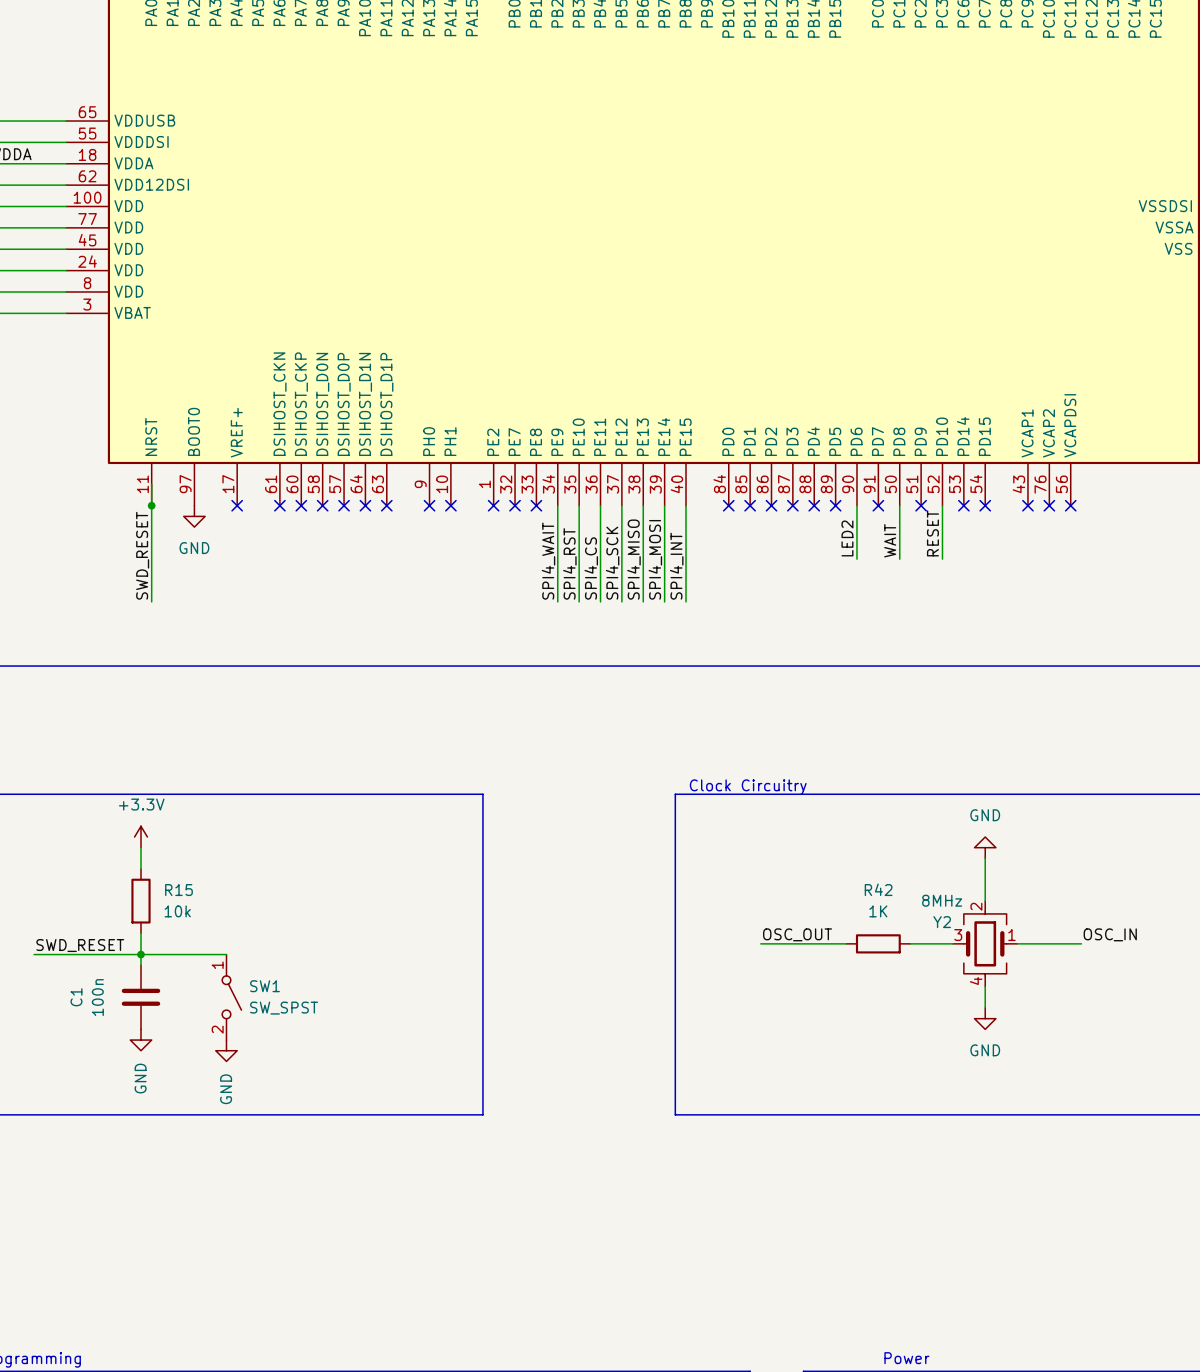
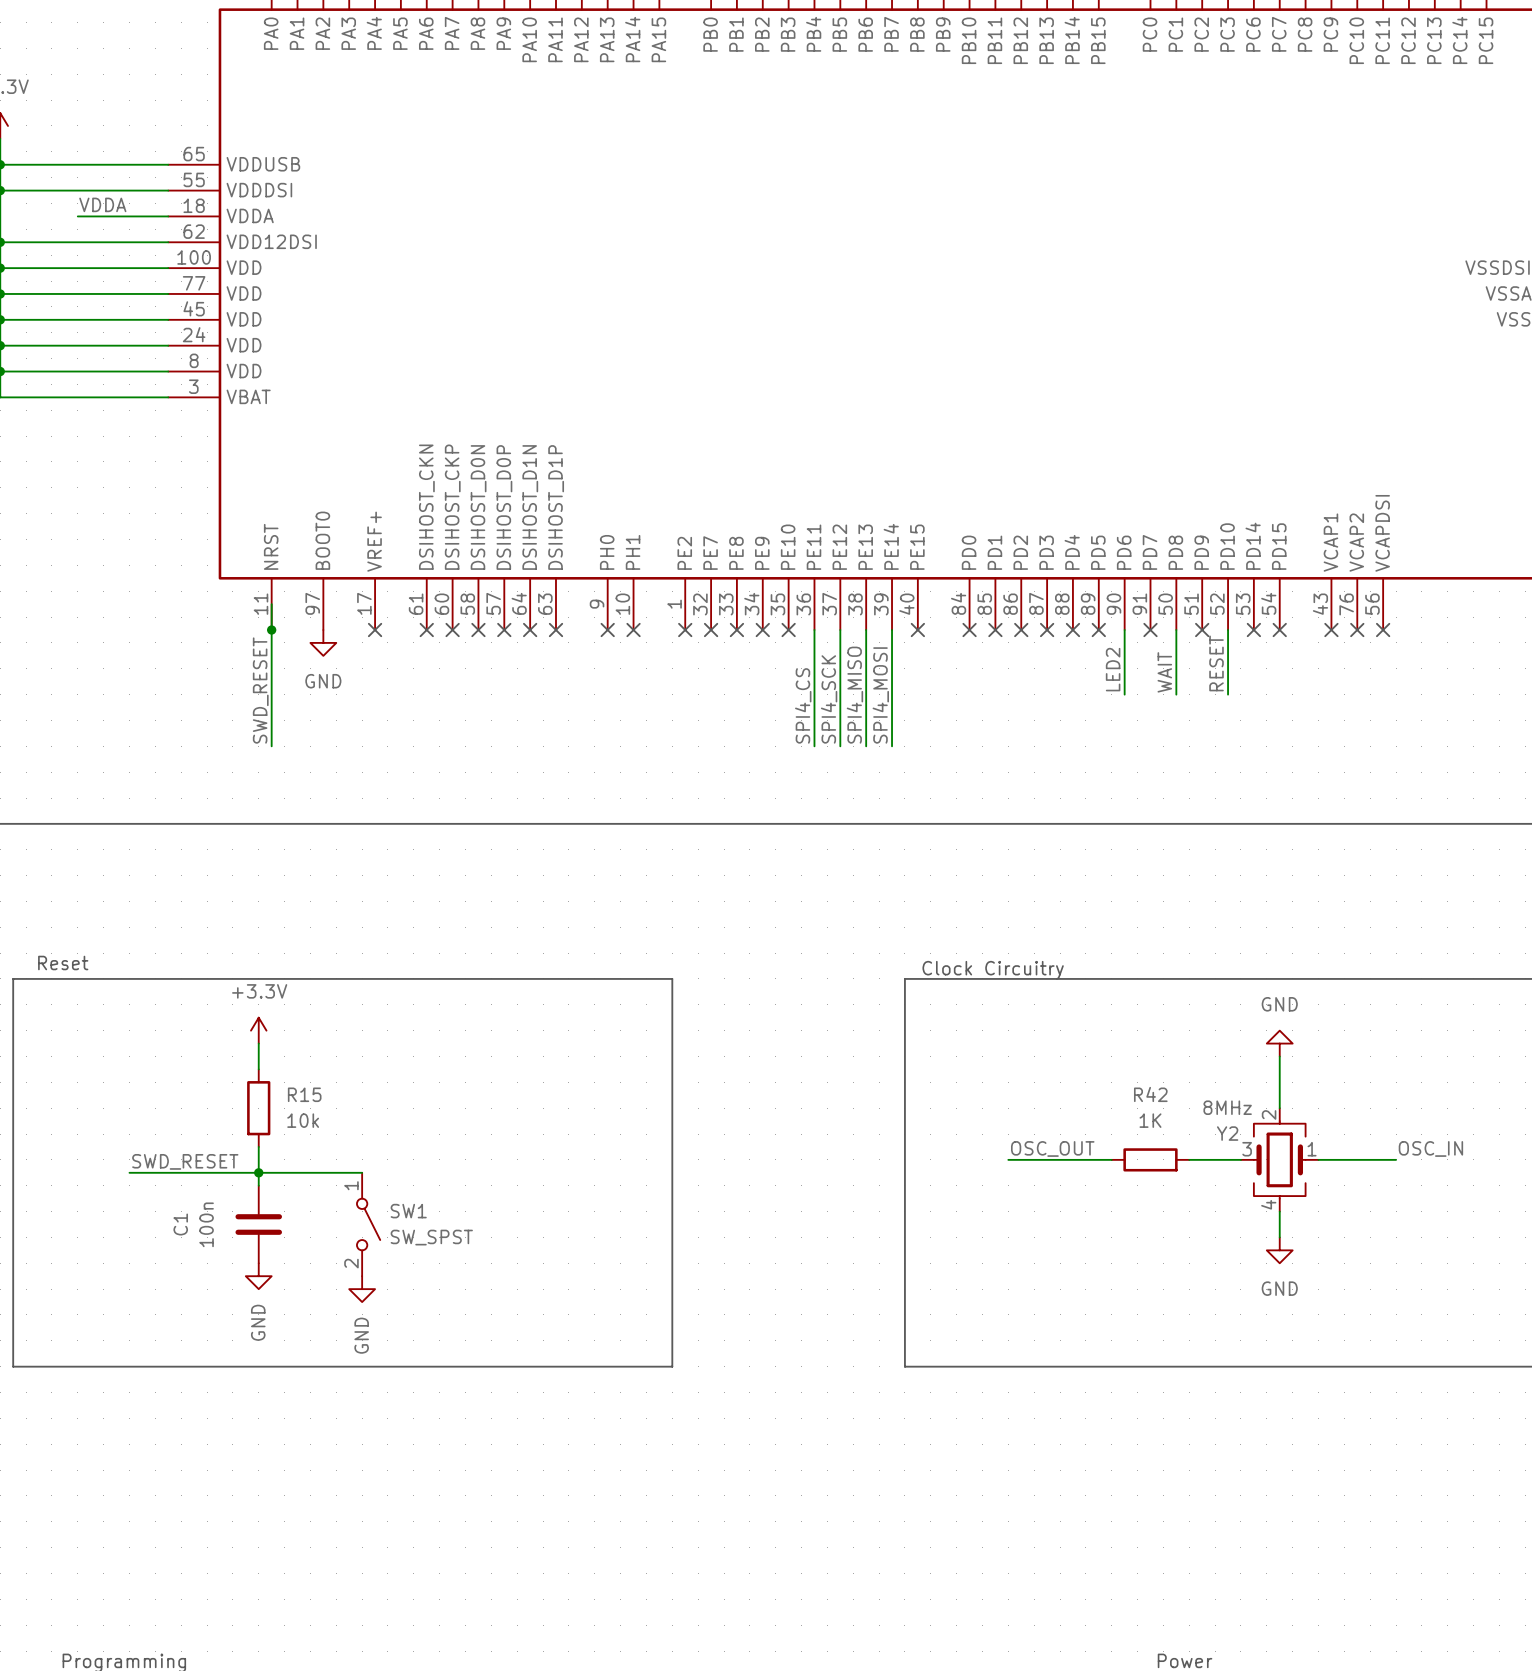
wire: (557, 505) (557, 601) -> none
no-connect mark: none -> (762, 630)
wire: (579, 505) (579, 601) -> none
no-connect mark: none -> (788, 630)
wire: (686, 505) (686, 601) -> none
no-connect mark: none -> (917, 630)
label: SPI4_WAIT (548, 561) -> none
label: SPI4_RST (569, 563) -> none
label: SPI4_INT (676, 566) -> none

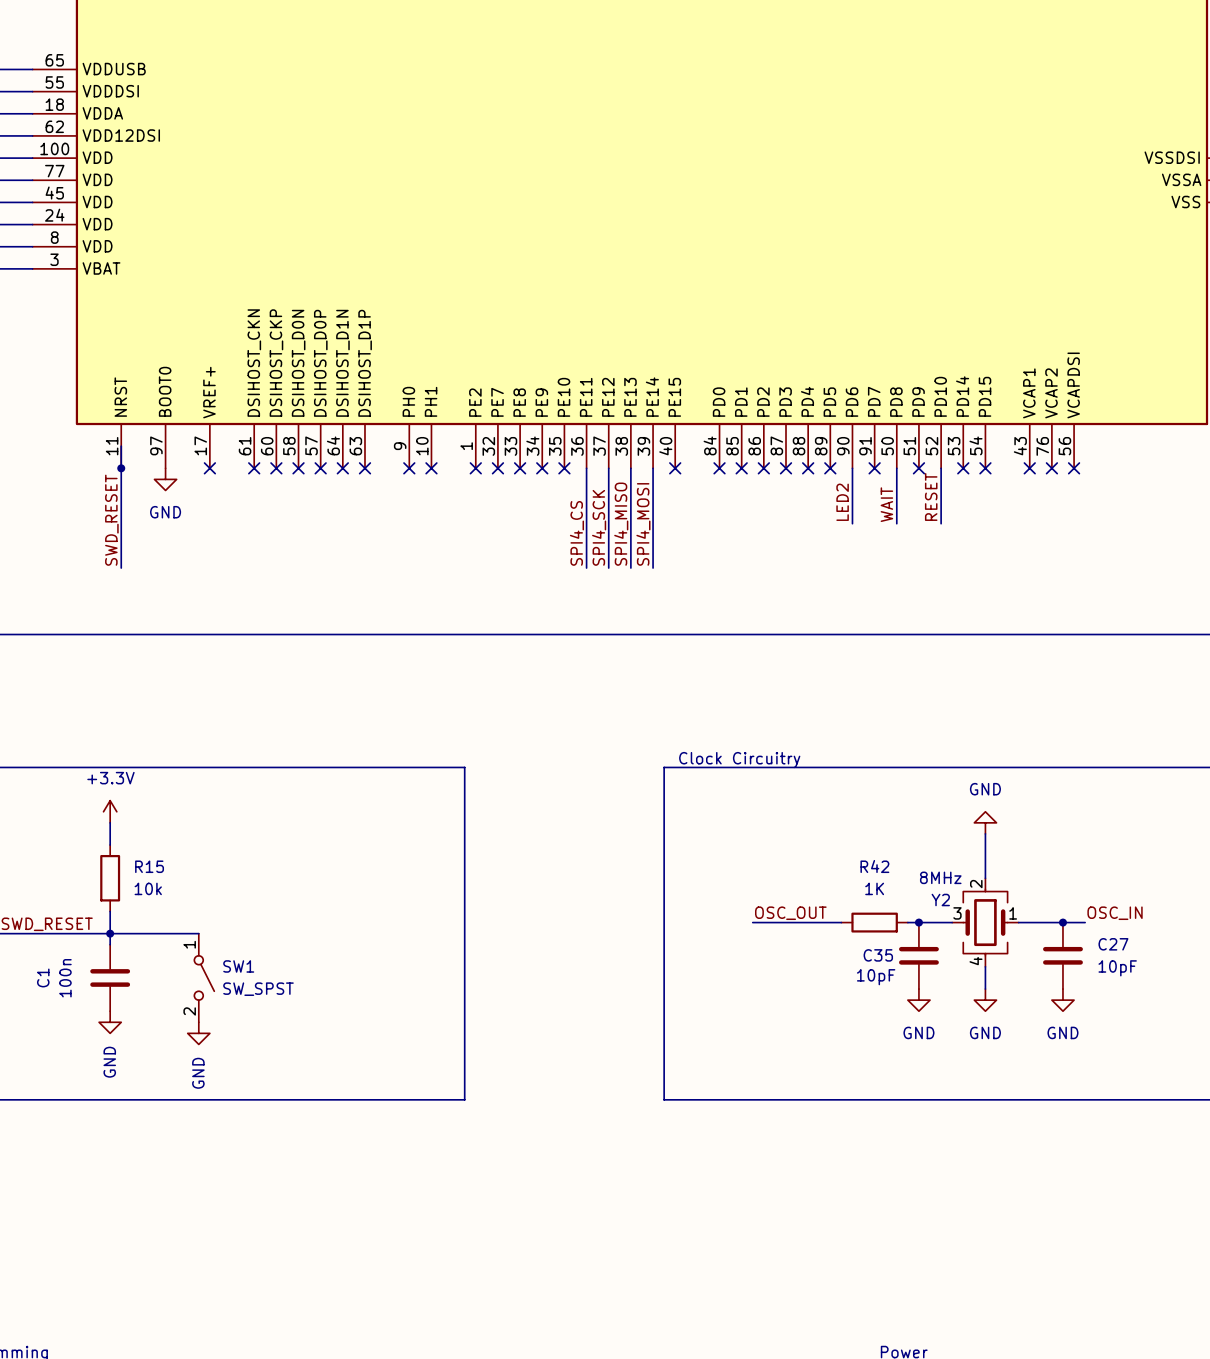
junction: none -> (918, 922)
junction: none -> (1062, 922)
C35: none -> 10pF (918, 955)
C27: none -> 10pF (1062, 955)
power symbol: none -> GND (918, 1000)
power symbol: none -> GND (1062, 1000)

